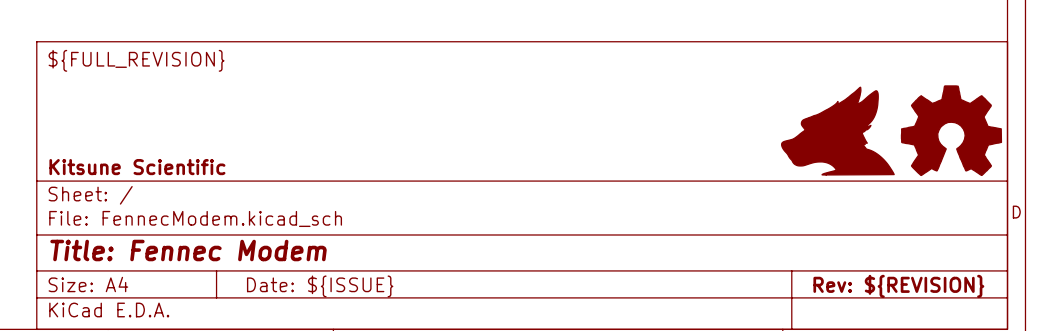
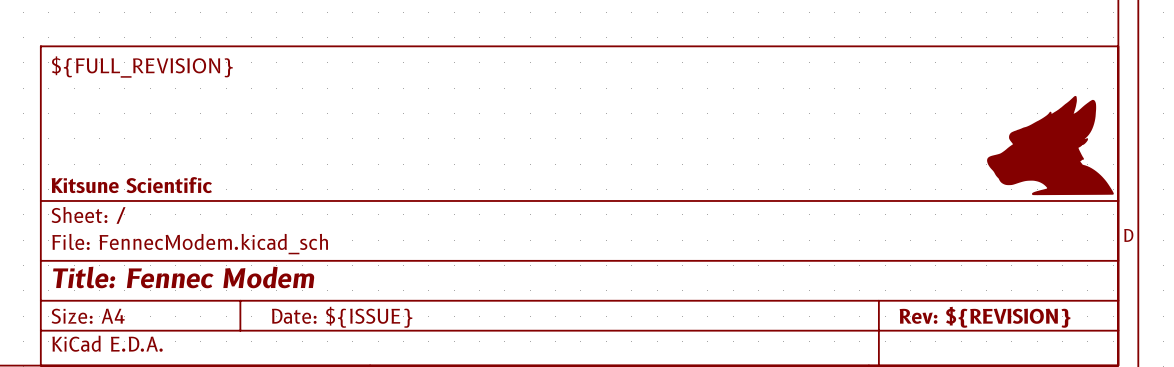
power symbol shape: [901, 85, 1002, 176] -> [987, 96, 1113, 195]
power symbol: (837, 131) -> none

